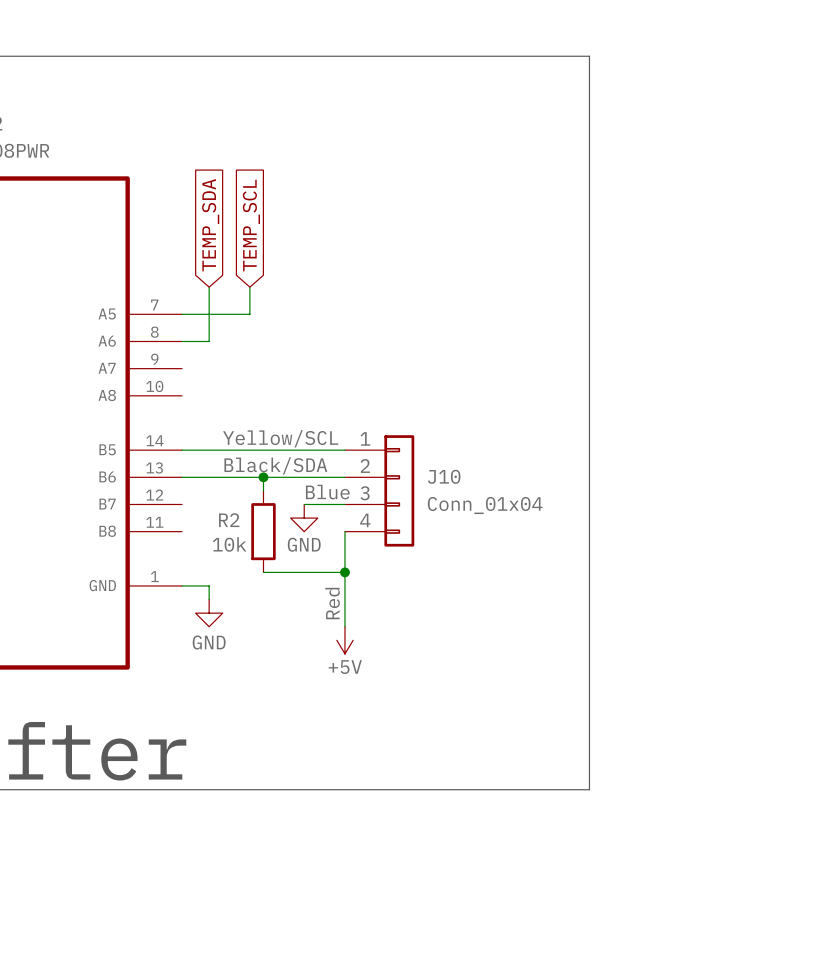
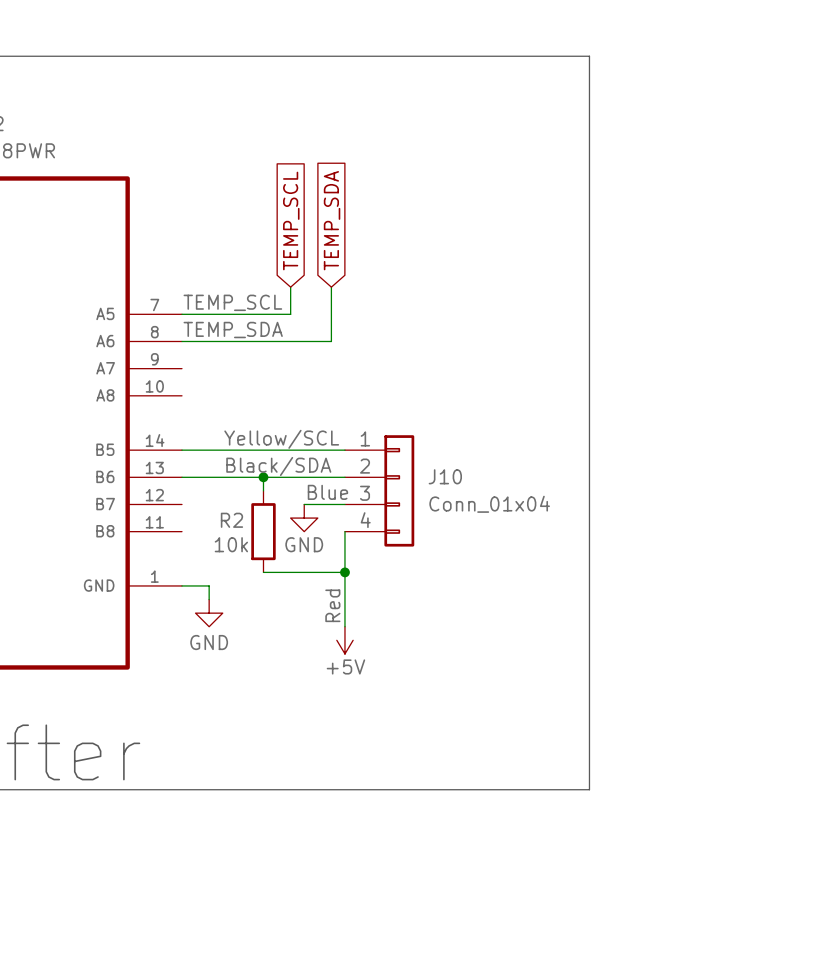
global label position: TEMP_SDA (210, 225) -> TEMP_SDA (332, 220)
global label position: TEMP_SCL (251, 225) -> TEMP_SCL (291, 221)
wire: (209, 287) (209, 341) -> (331, 287) (331, 341) (209, 341)
wire: (249, 287) (249, 314) -> (290, 287) (290, 314) (249, 314)
label: none -> TEMP_SCL (232, 302)
label: none -> TEMP_SDA (233, 330)

